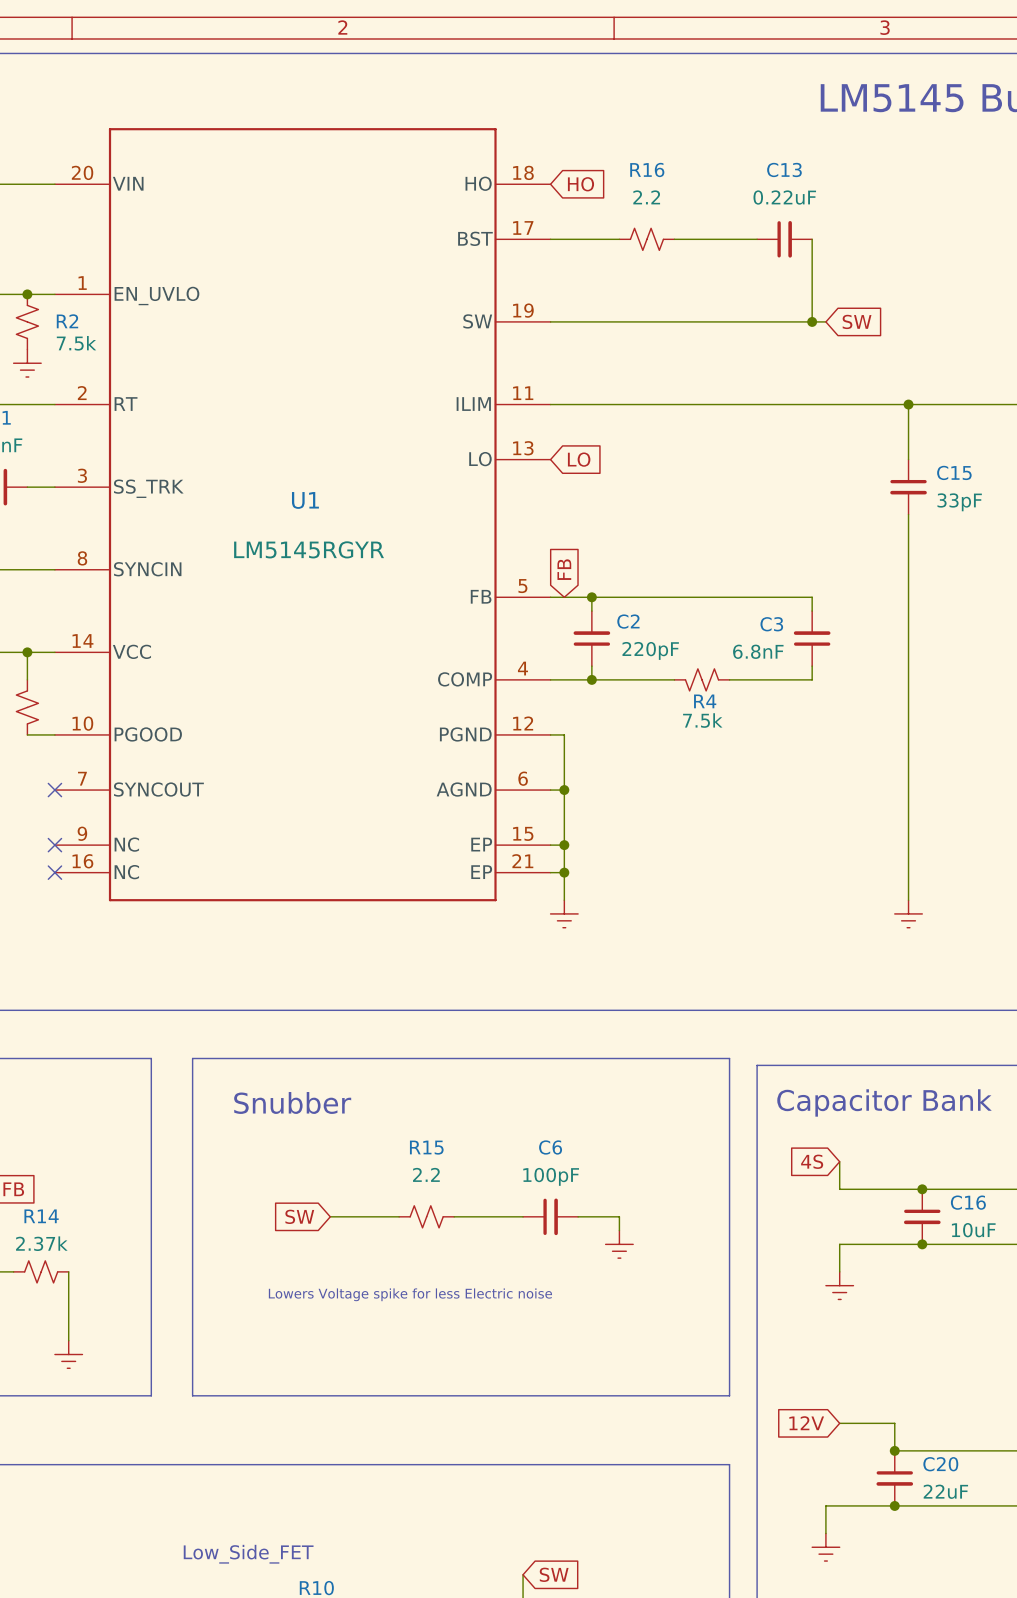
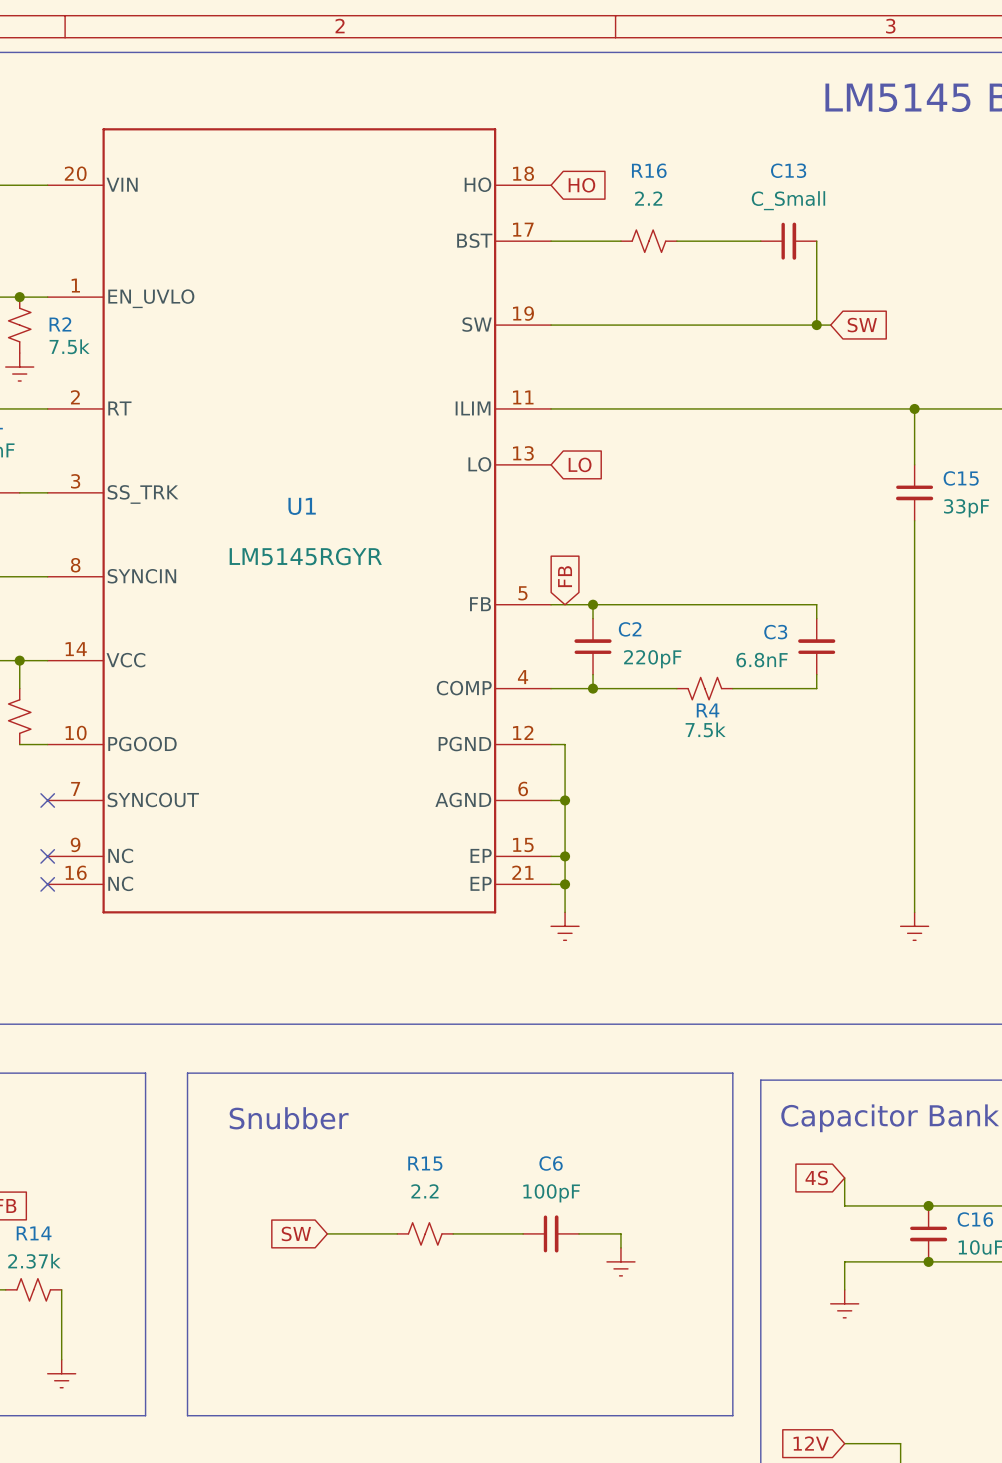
C13 value: 0.22uF (784, 197) -> C_Small (788, 200)
text: Lowers Voltage spike for less Electric noise (410, 1294) -> none

